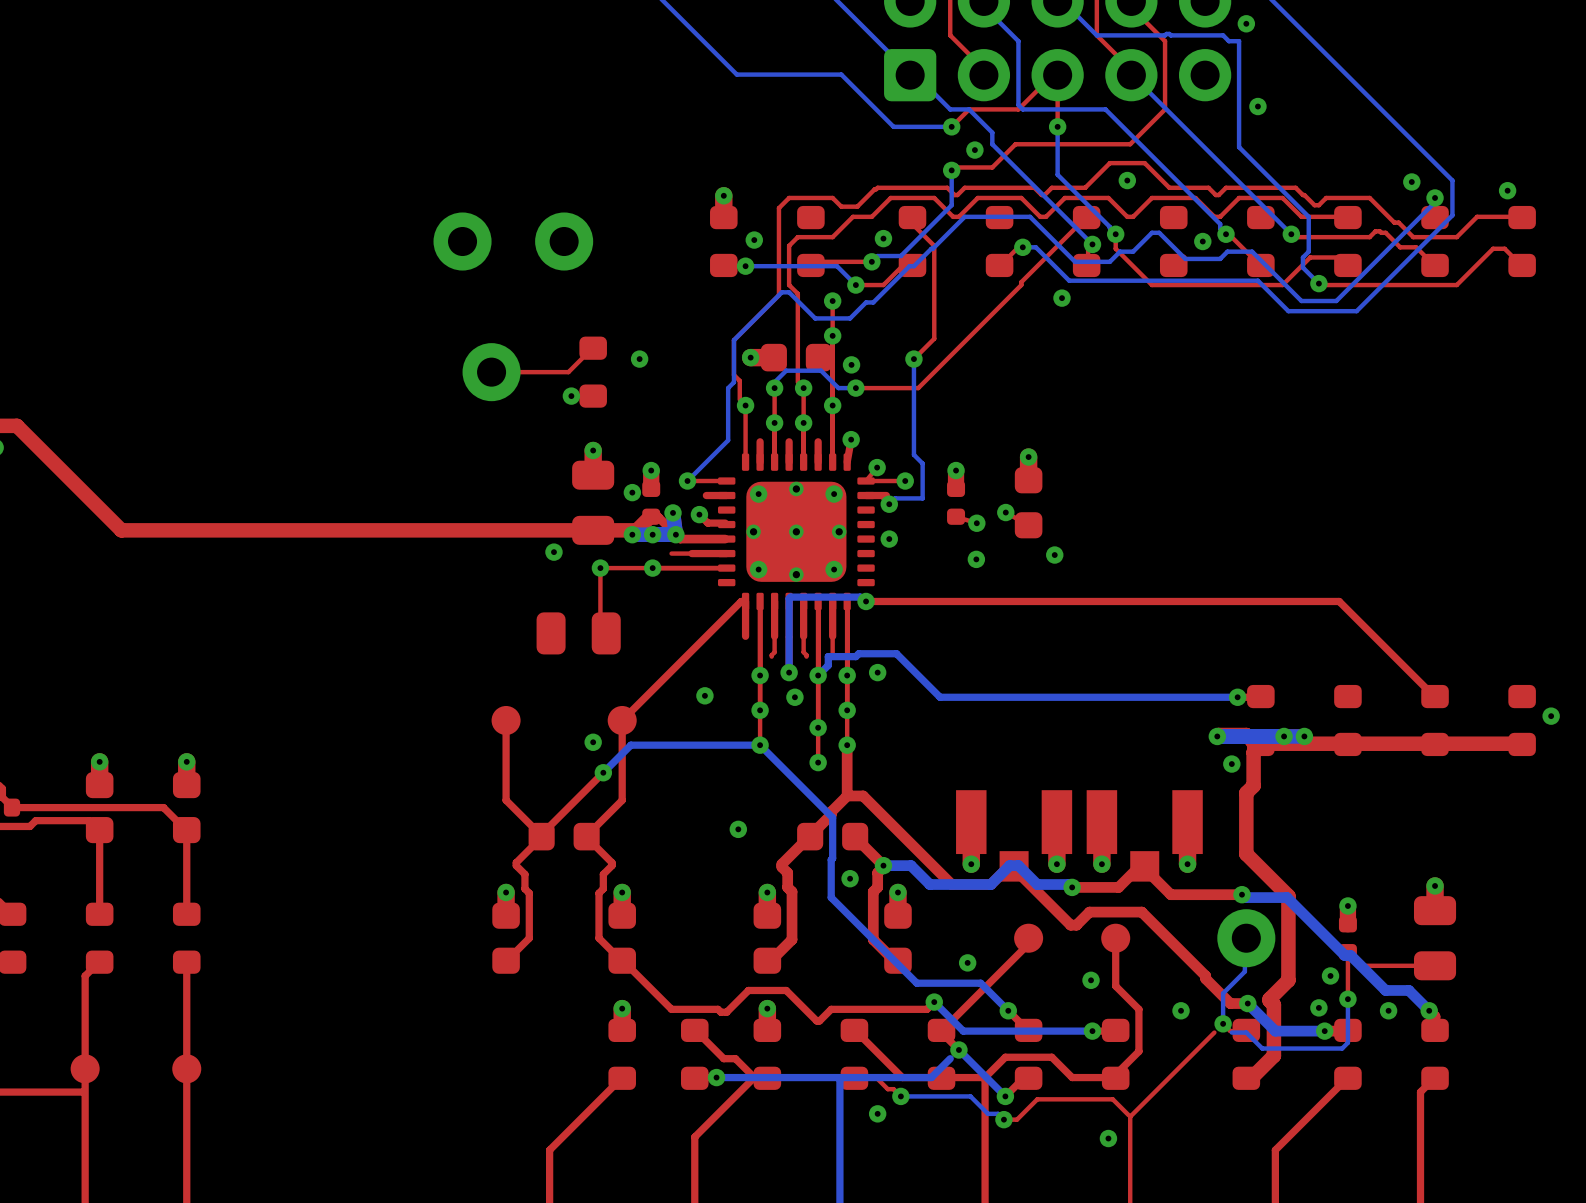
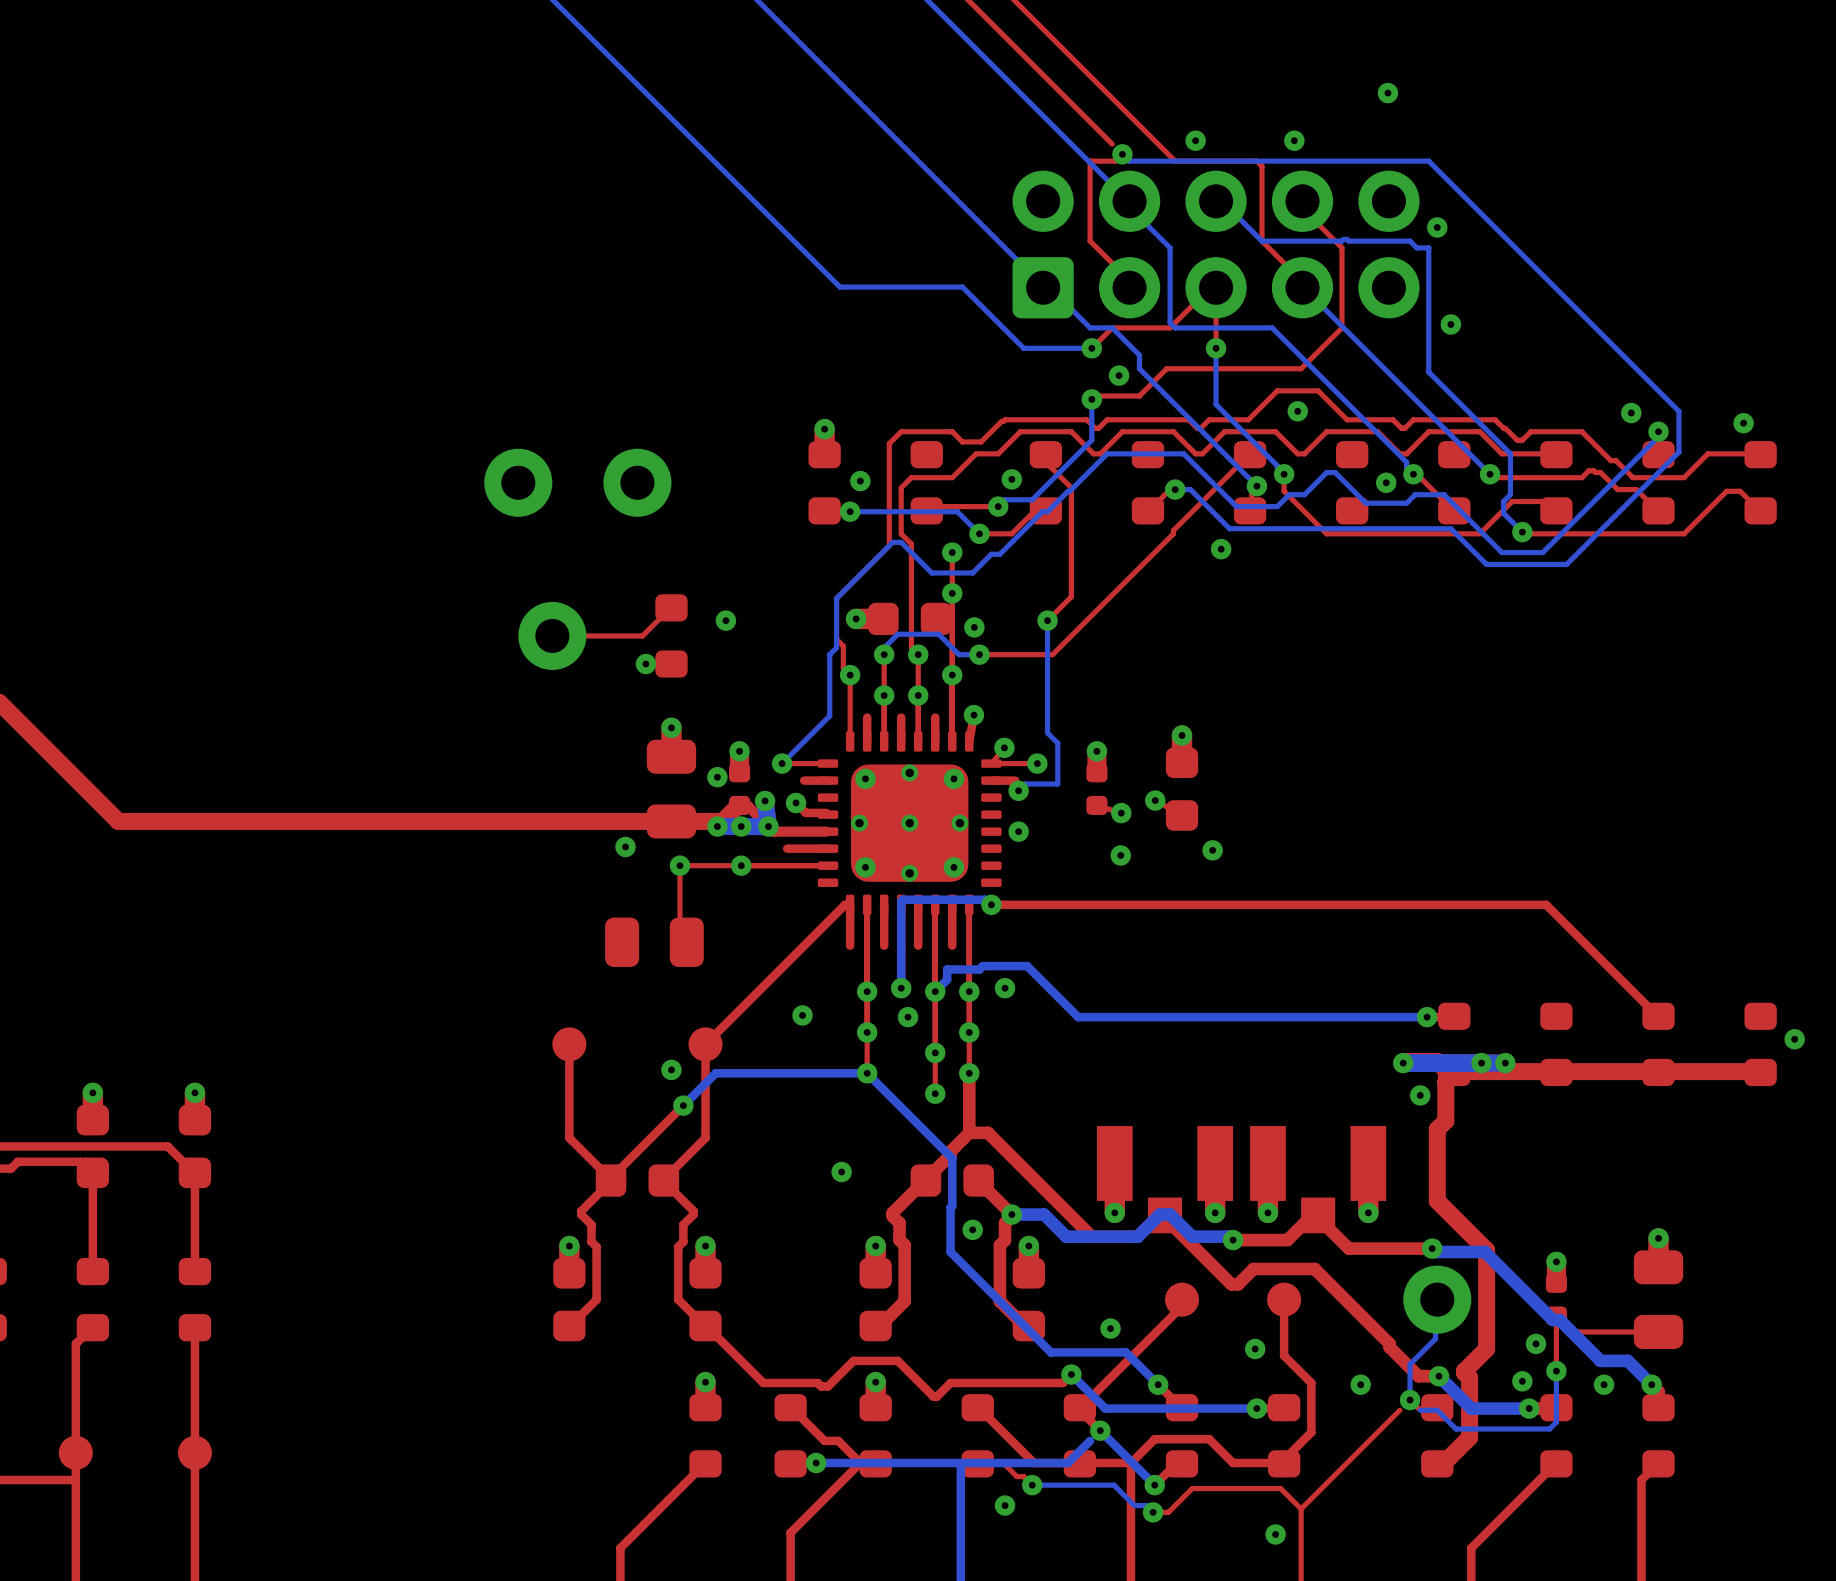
top track: (690, 553) (671, 553) -> none
top track: (774, 637) (774, 652) (771, 656) -> none
top track: (803, 637) (803, 652) (806, 656) -> none
top track: (832, 637) (832, 656) -> none

